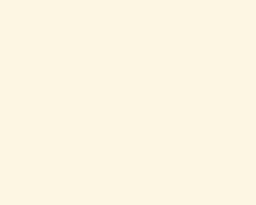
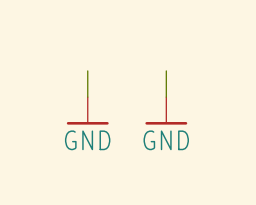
wire: none -> (87, 70) (87, 97)
wire: none -> (166, 70) (166, 97)
power symbol: none -> GND (87, 110)
power symbol: none -> GND (166, 110)

